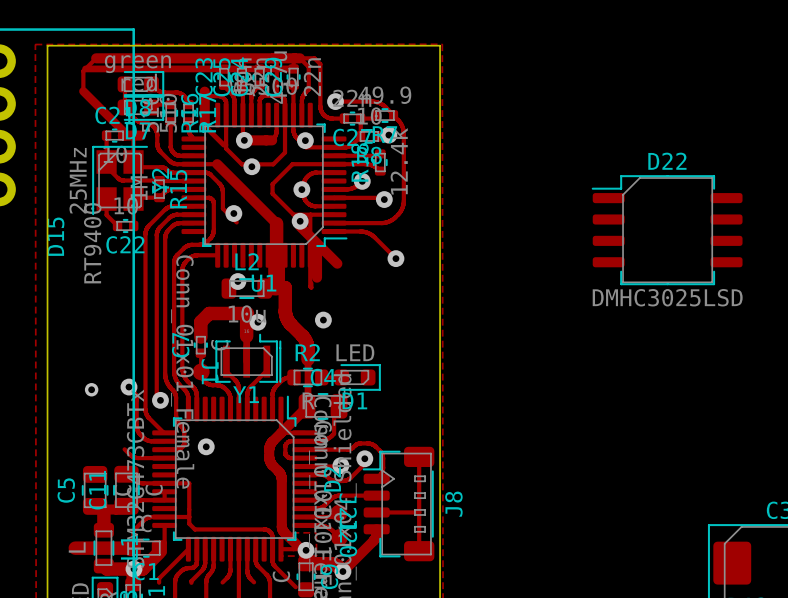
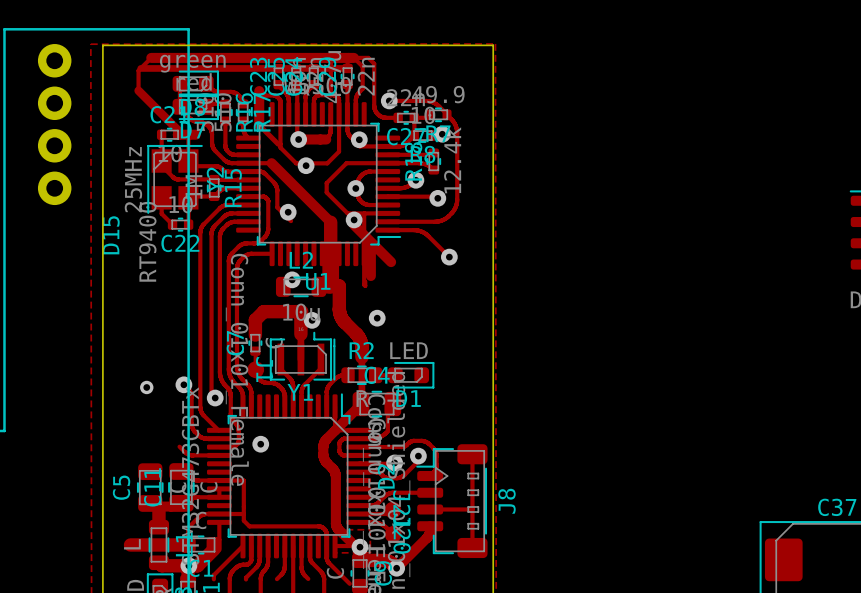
D22: DMHC3025LSD (667, 230) -> none

